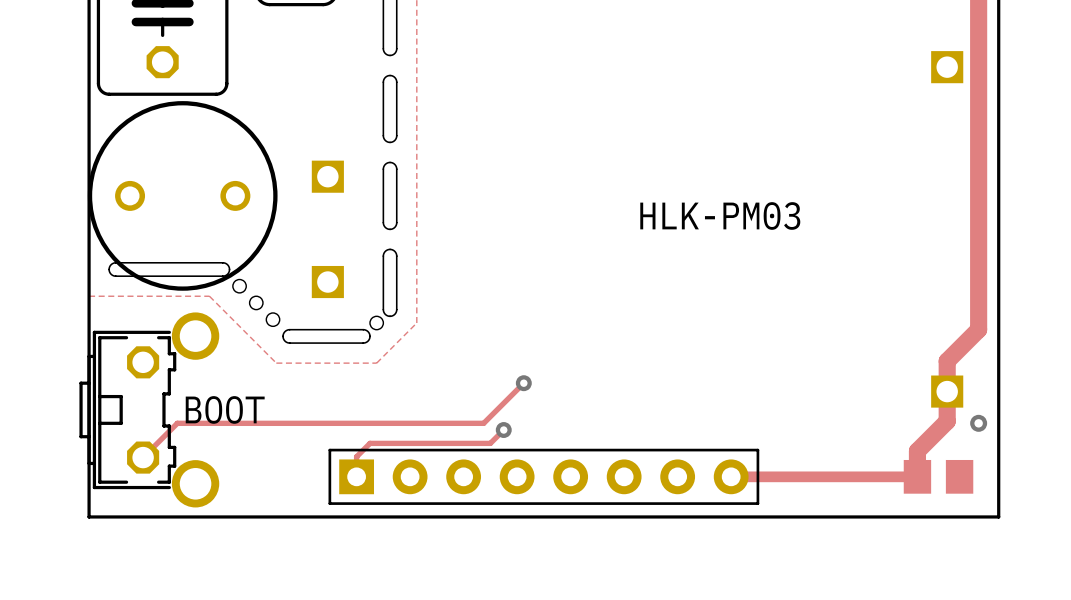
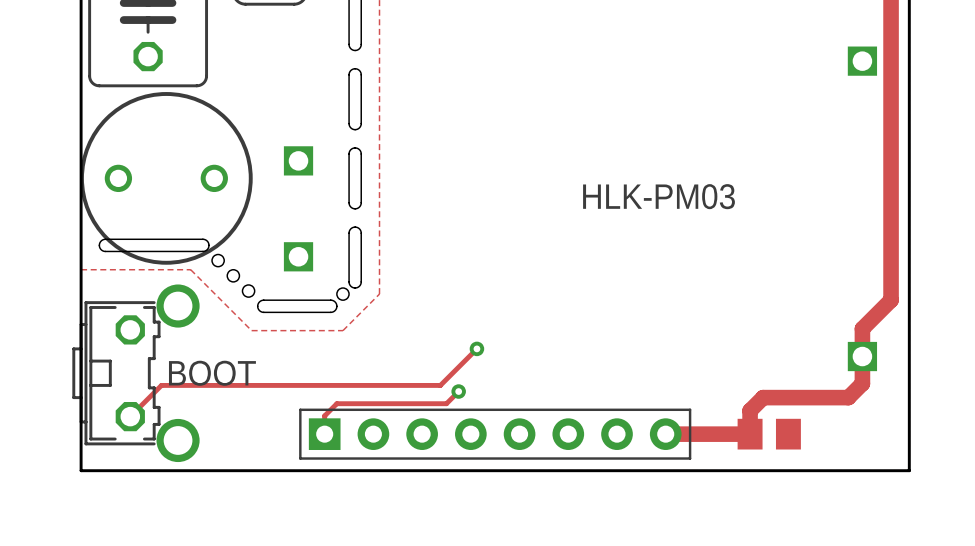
via: (978, 423) -> none
track: (931, 436) (917, 451) (917, 476) (823, 476) -> (848, 397) (763, 397) (750, 410) (750, 434)
track width: thin (731, 476) (823, 476) -> thick (665, 434) (750, 434)
part position: (938, 476) -> (769, 434)

